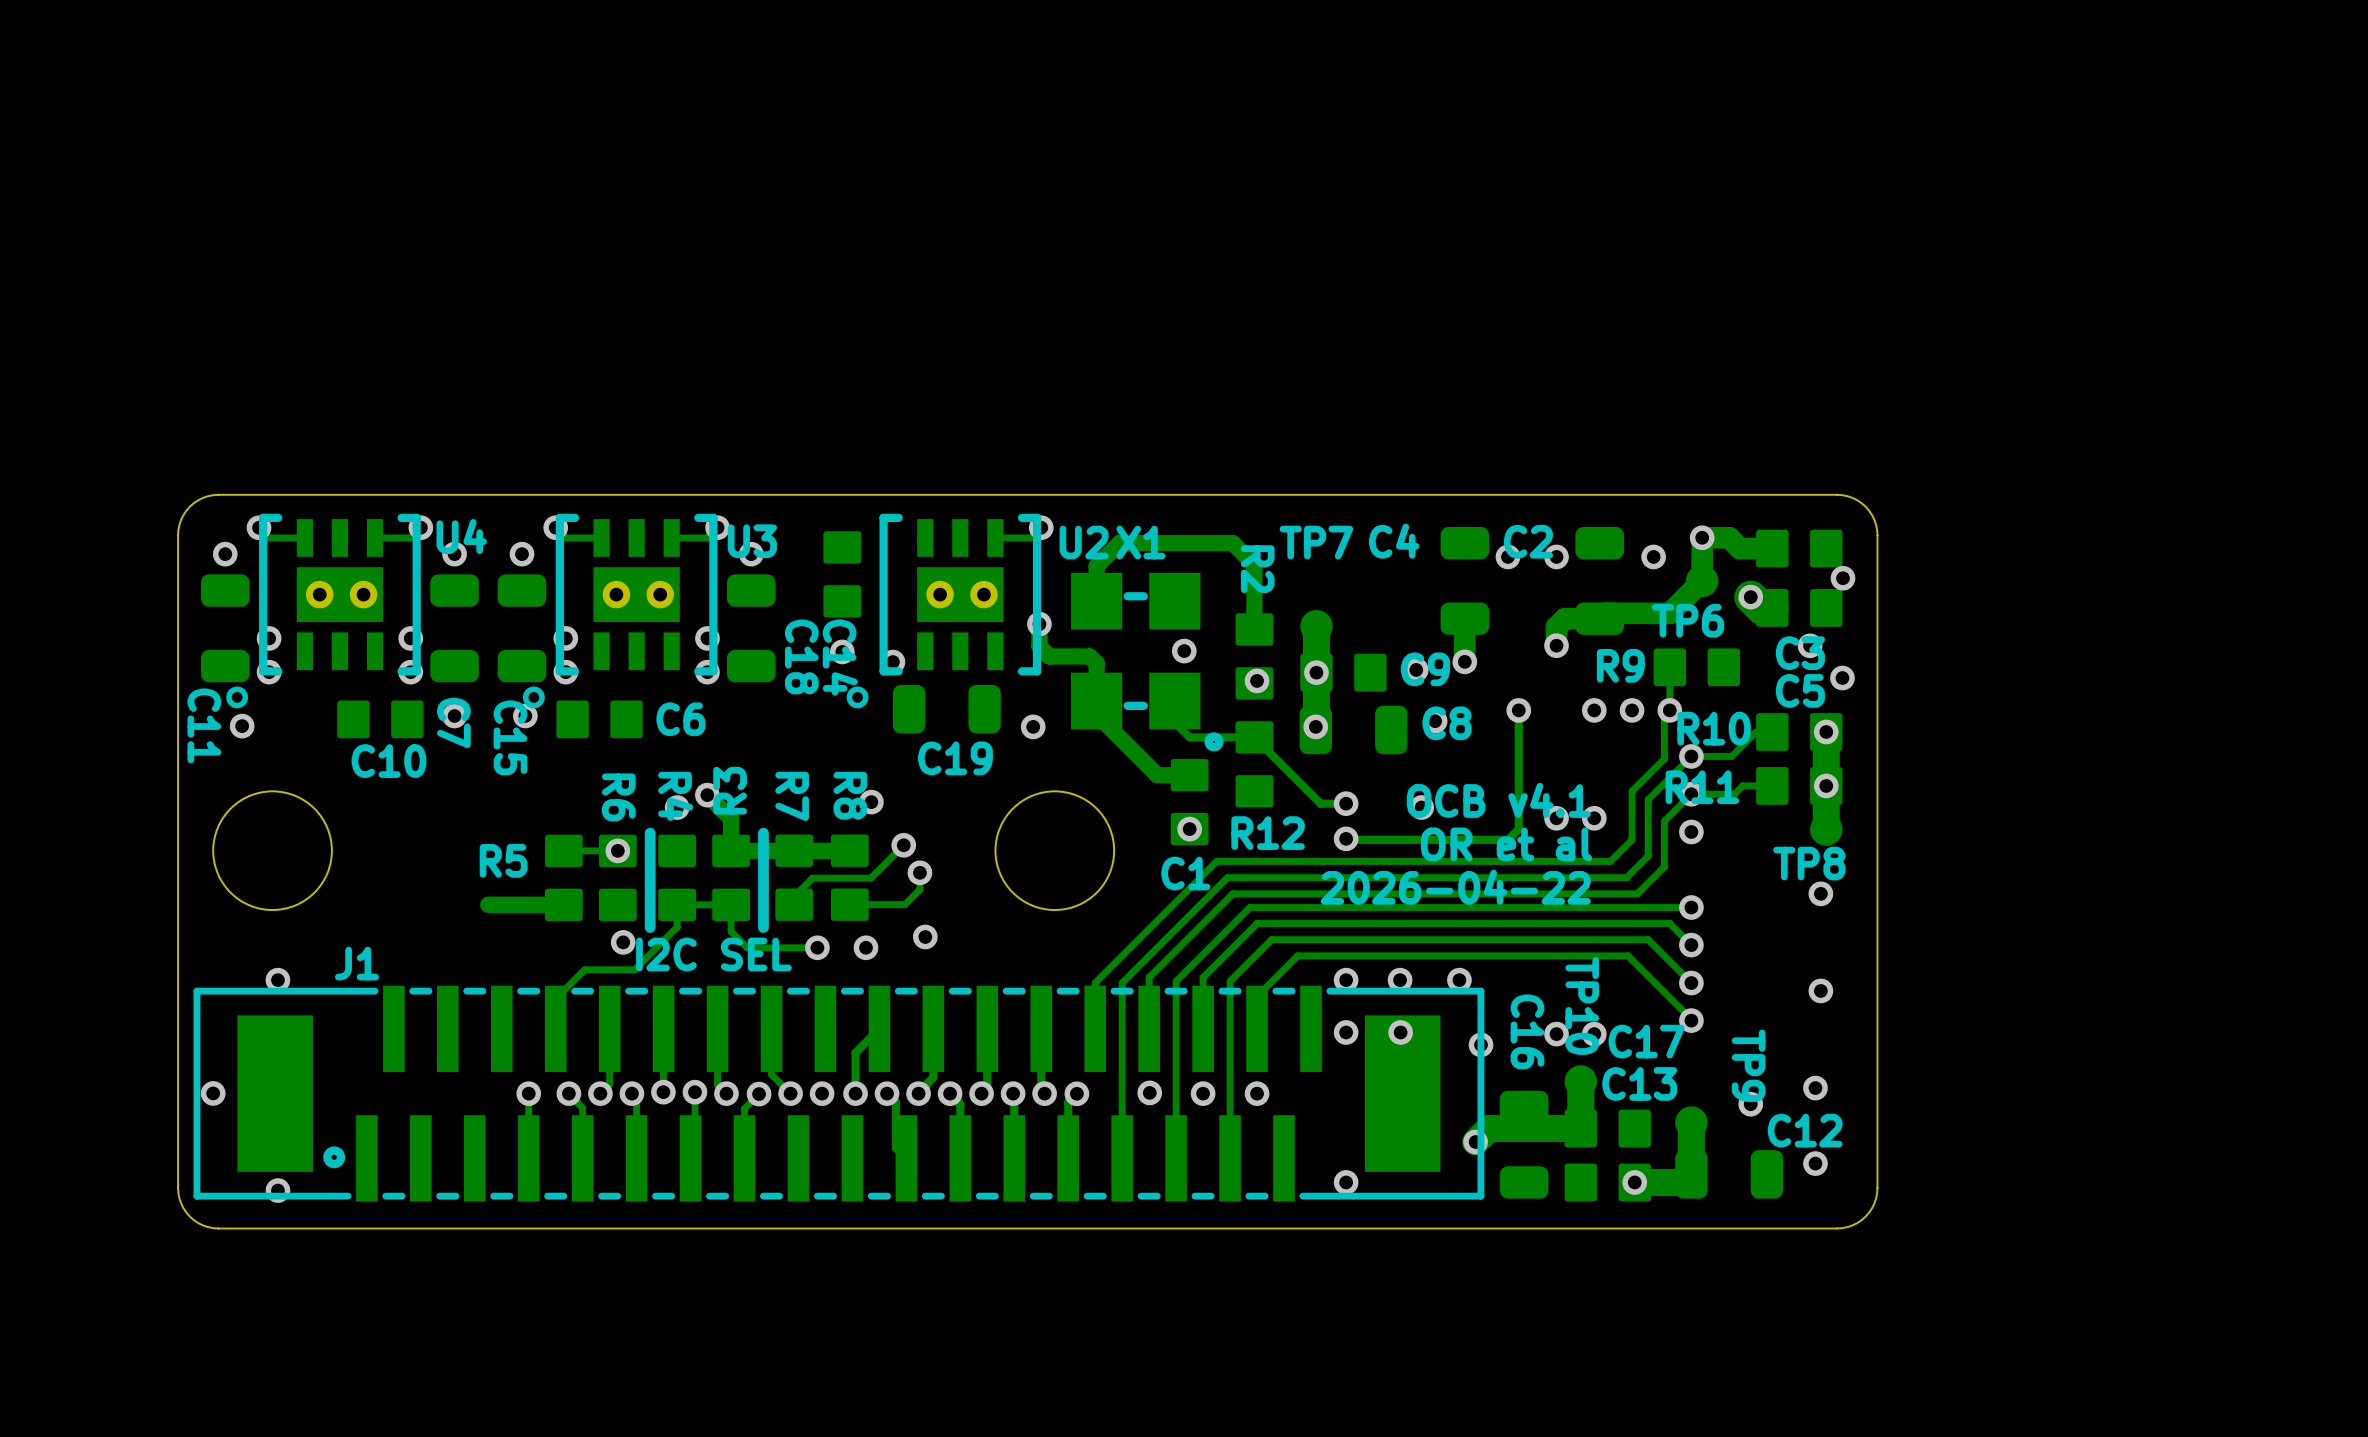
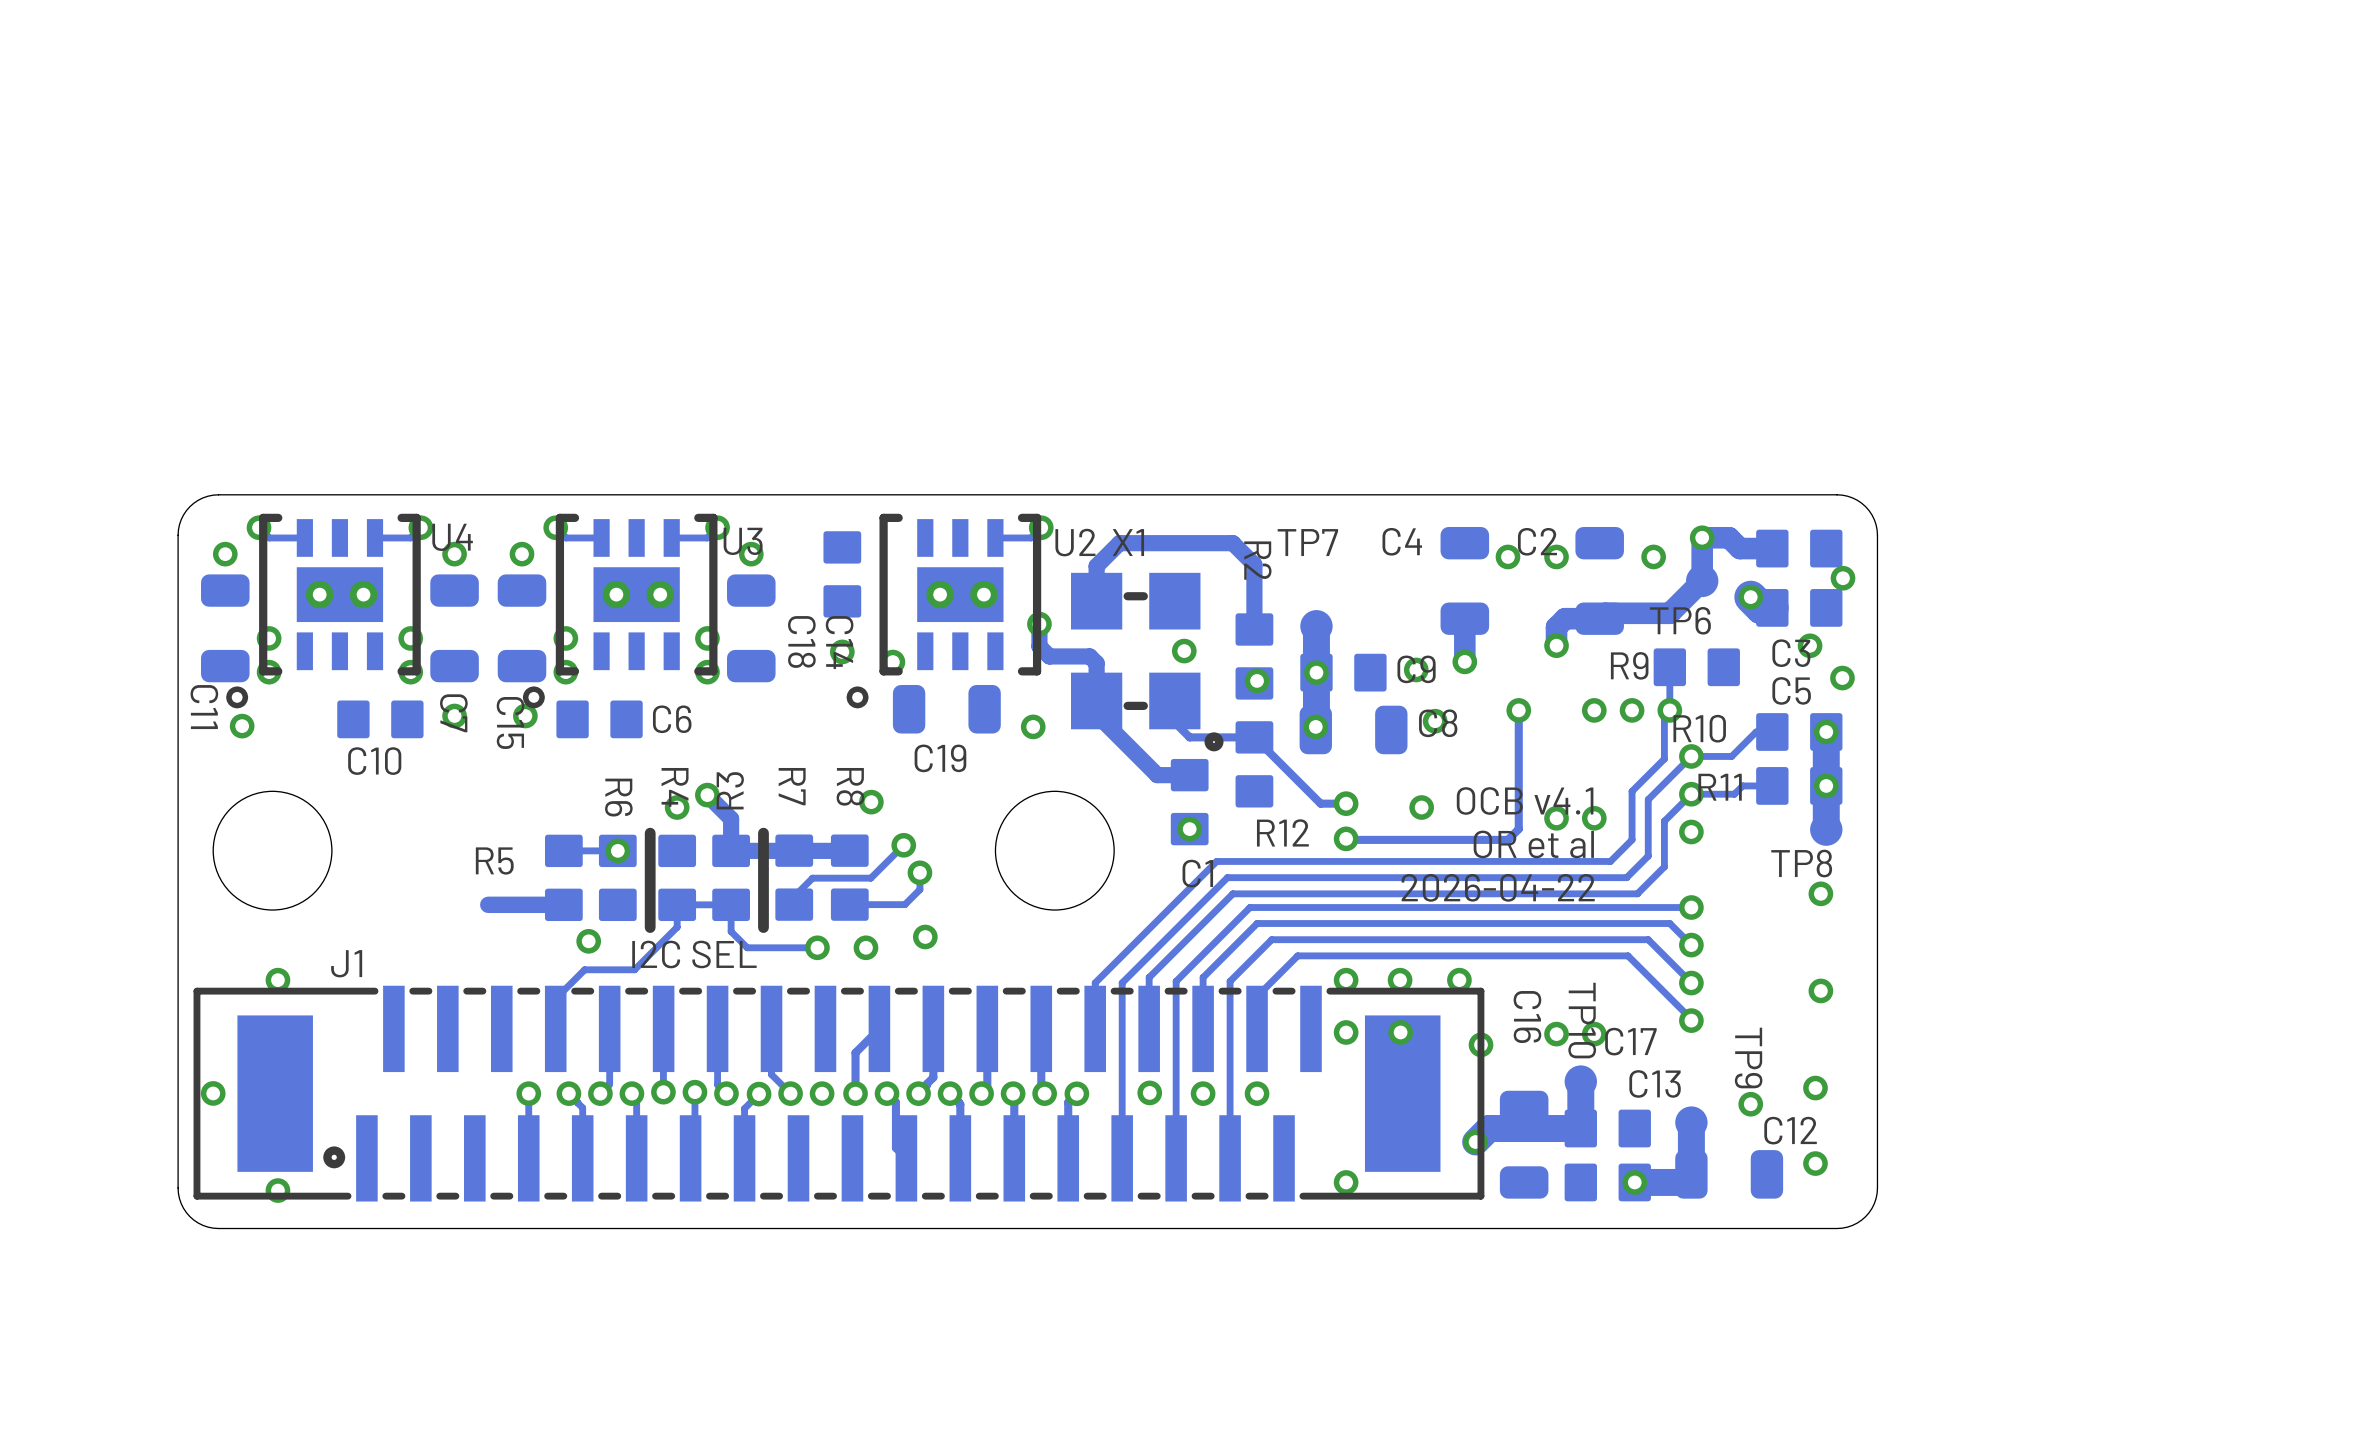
via position: (623, 942) -> (588, 941)

